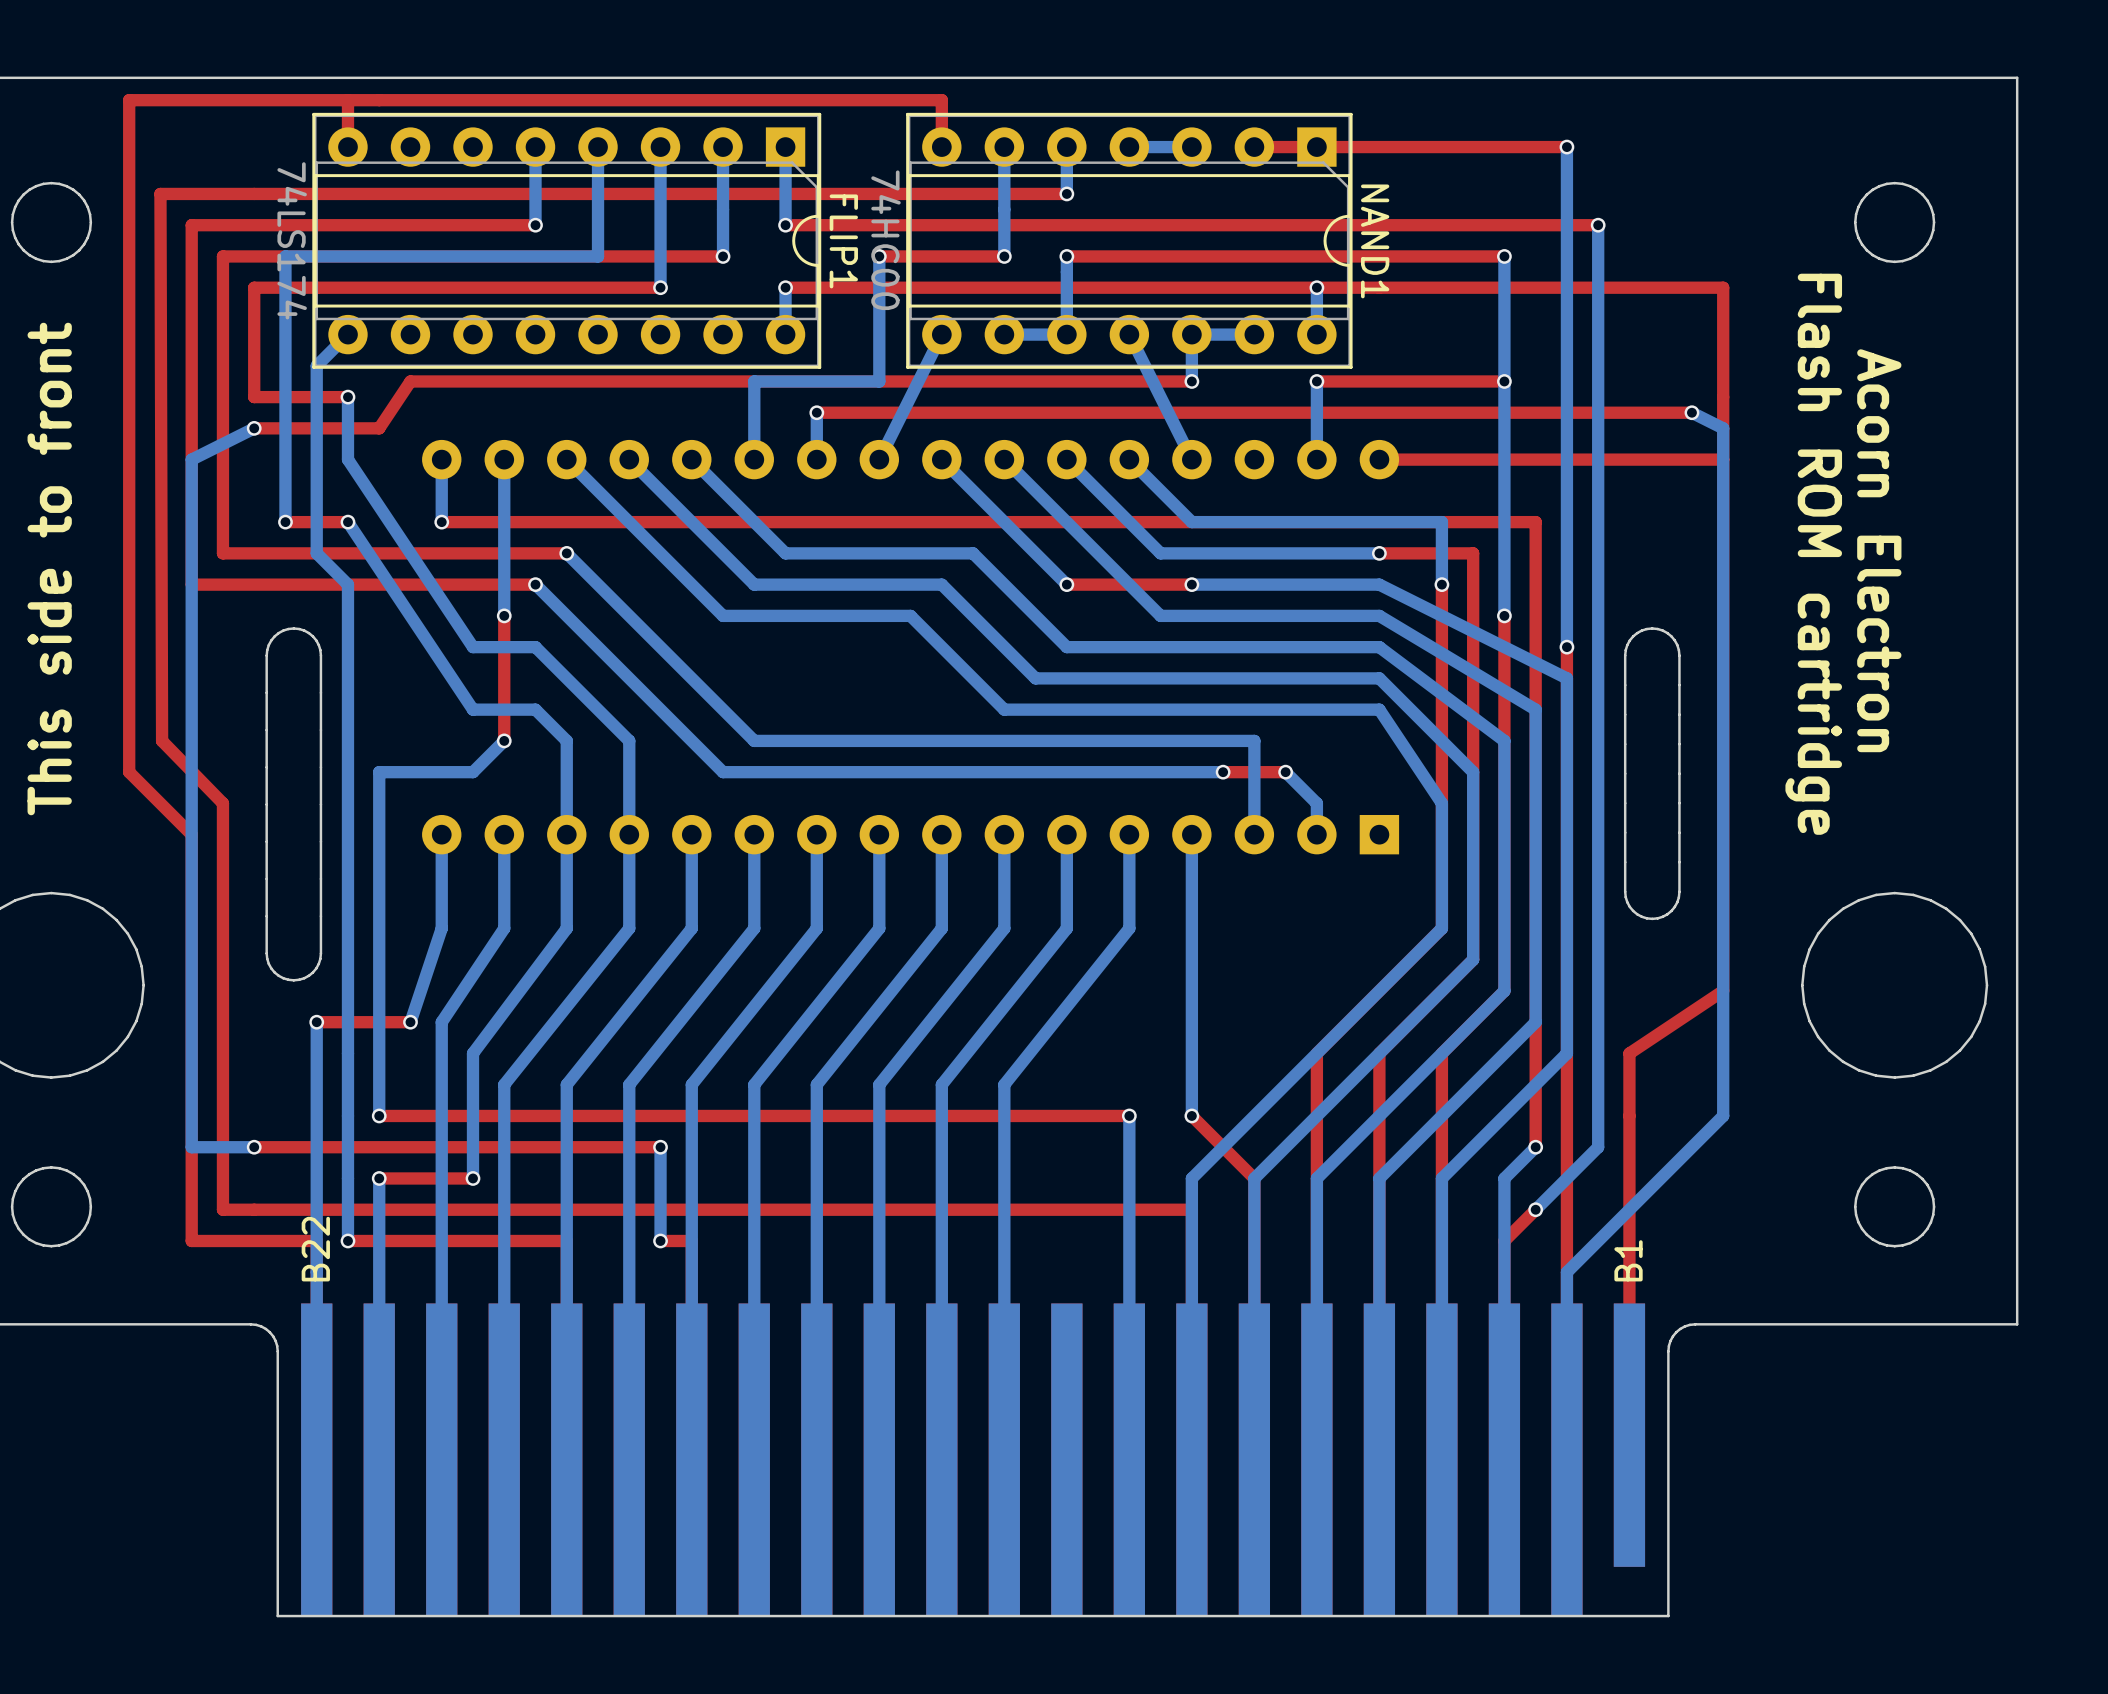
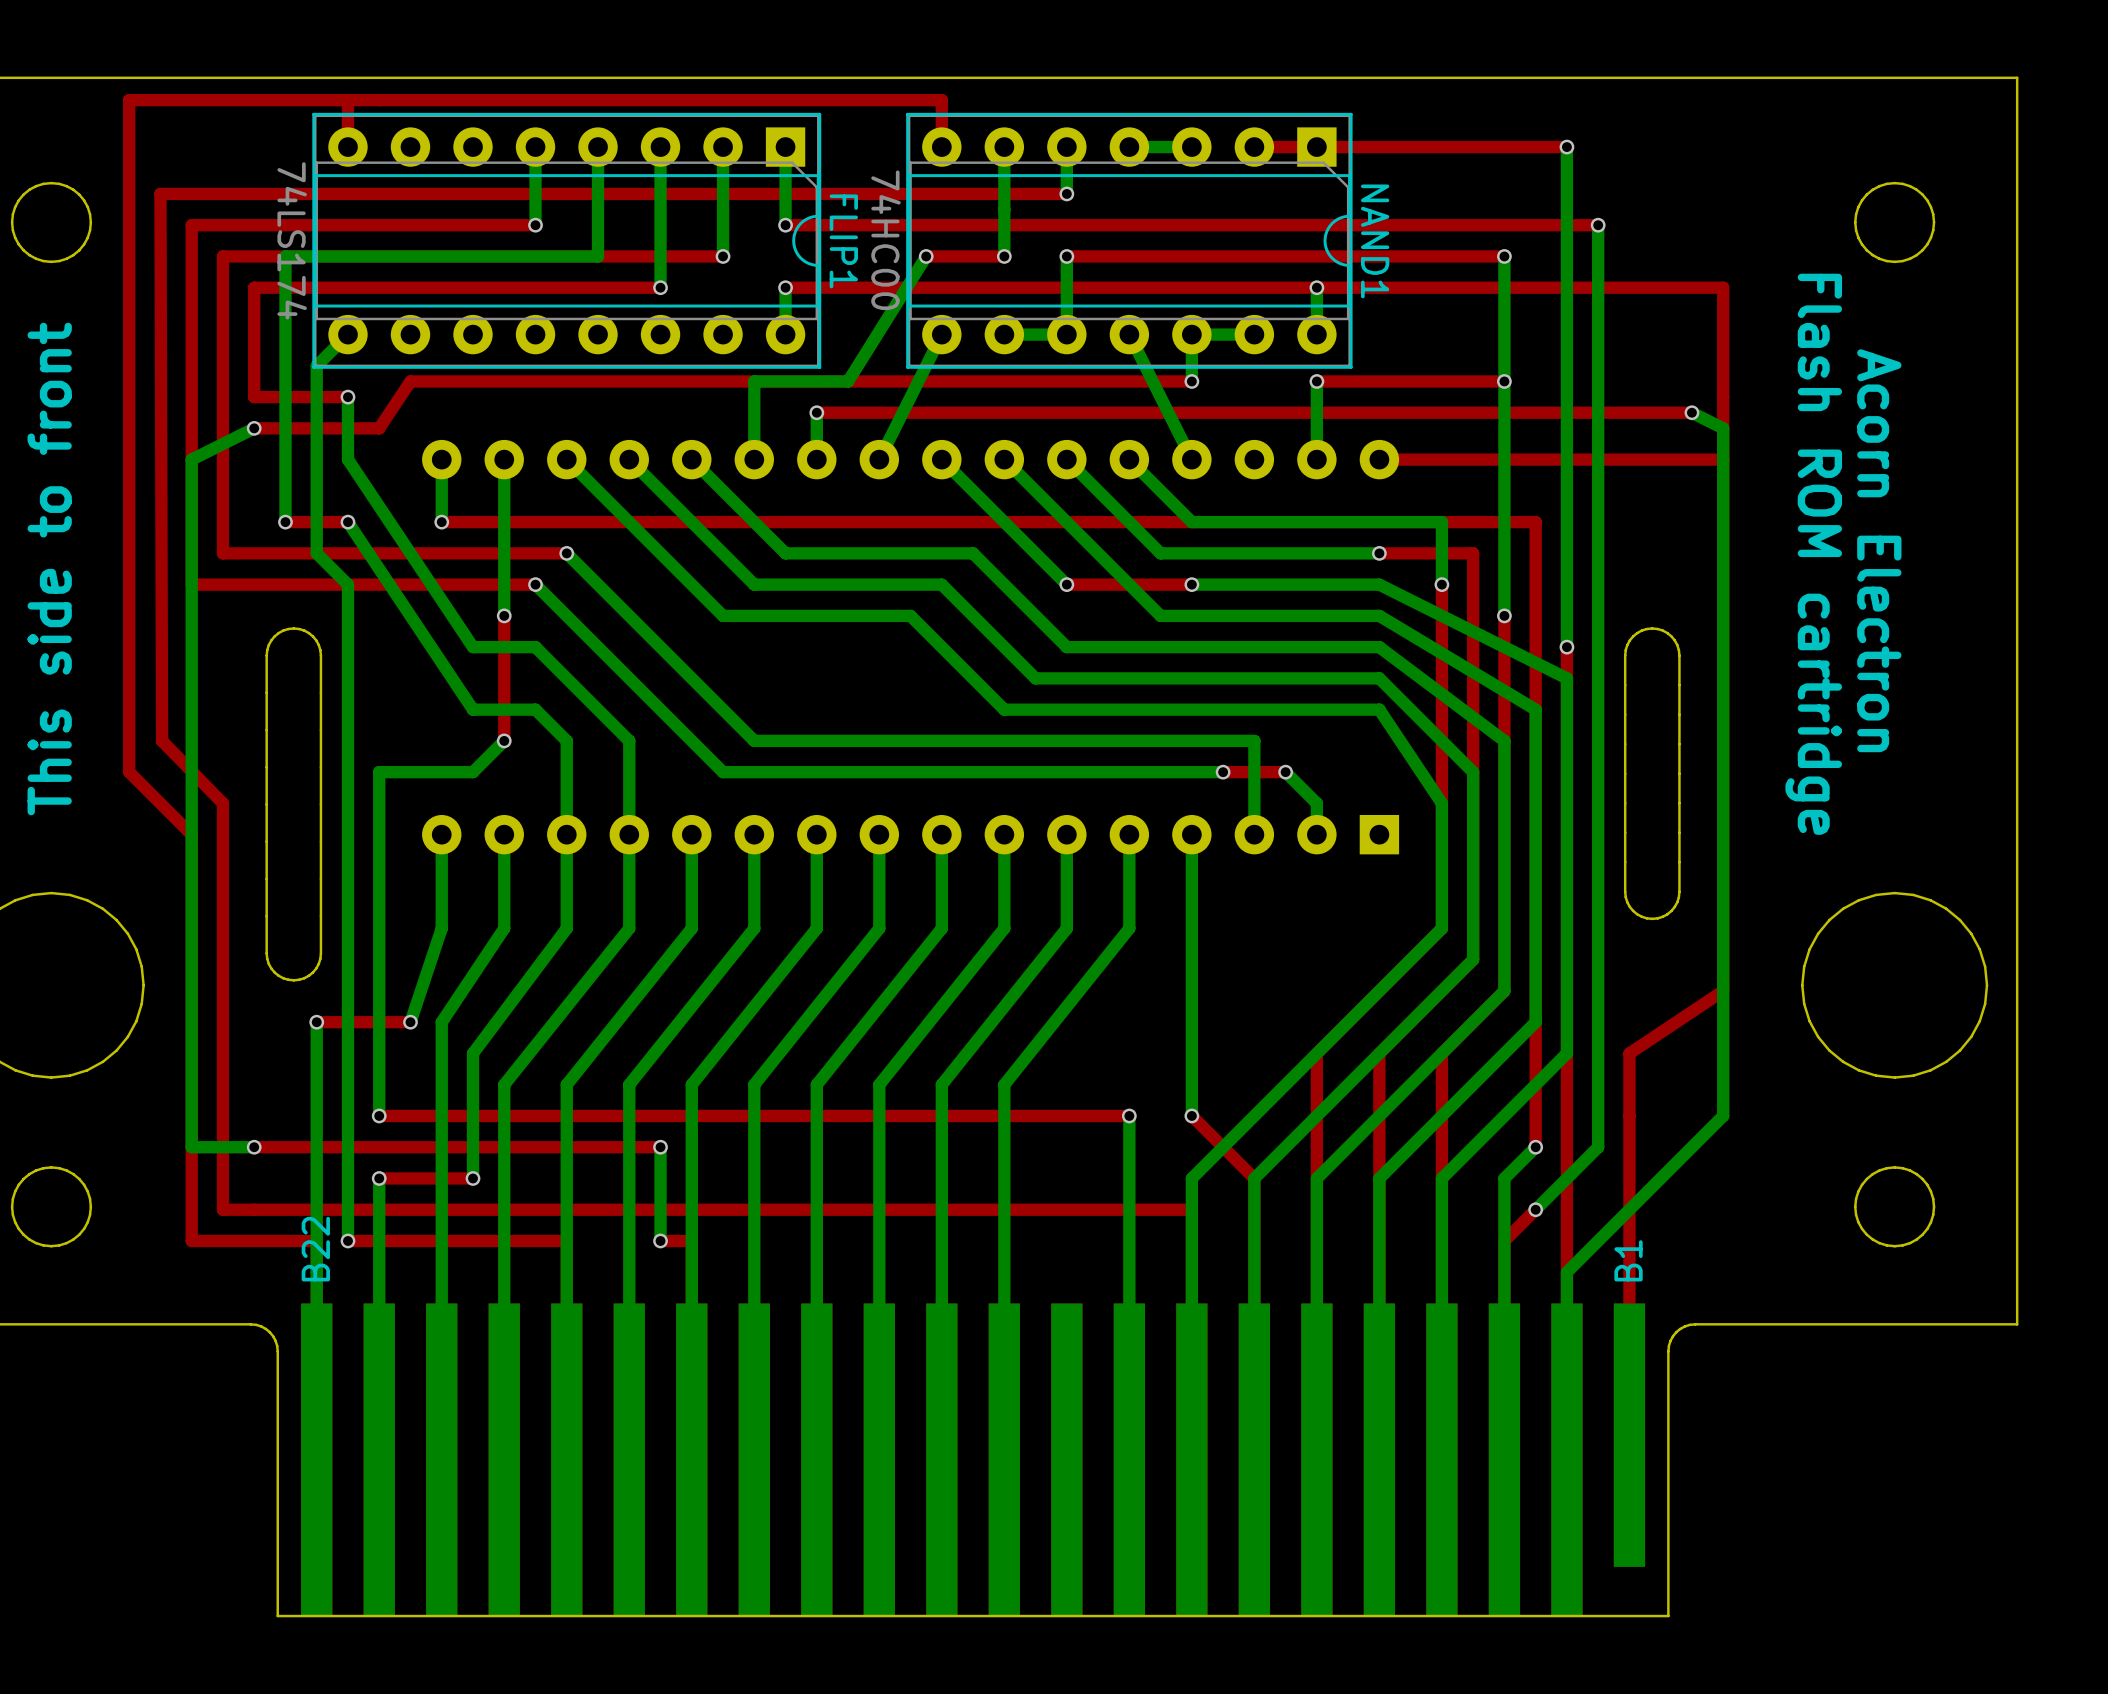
bottom track: (879, 256) (879, 381) (848, 381) -> (926, 256) (848, 381)
via position: (879, 256) -> (926, 256)
top track: (926, 256) (879, 256) -> none

